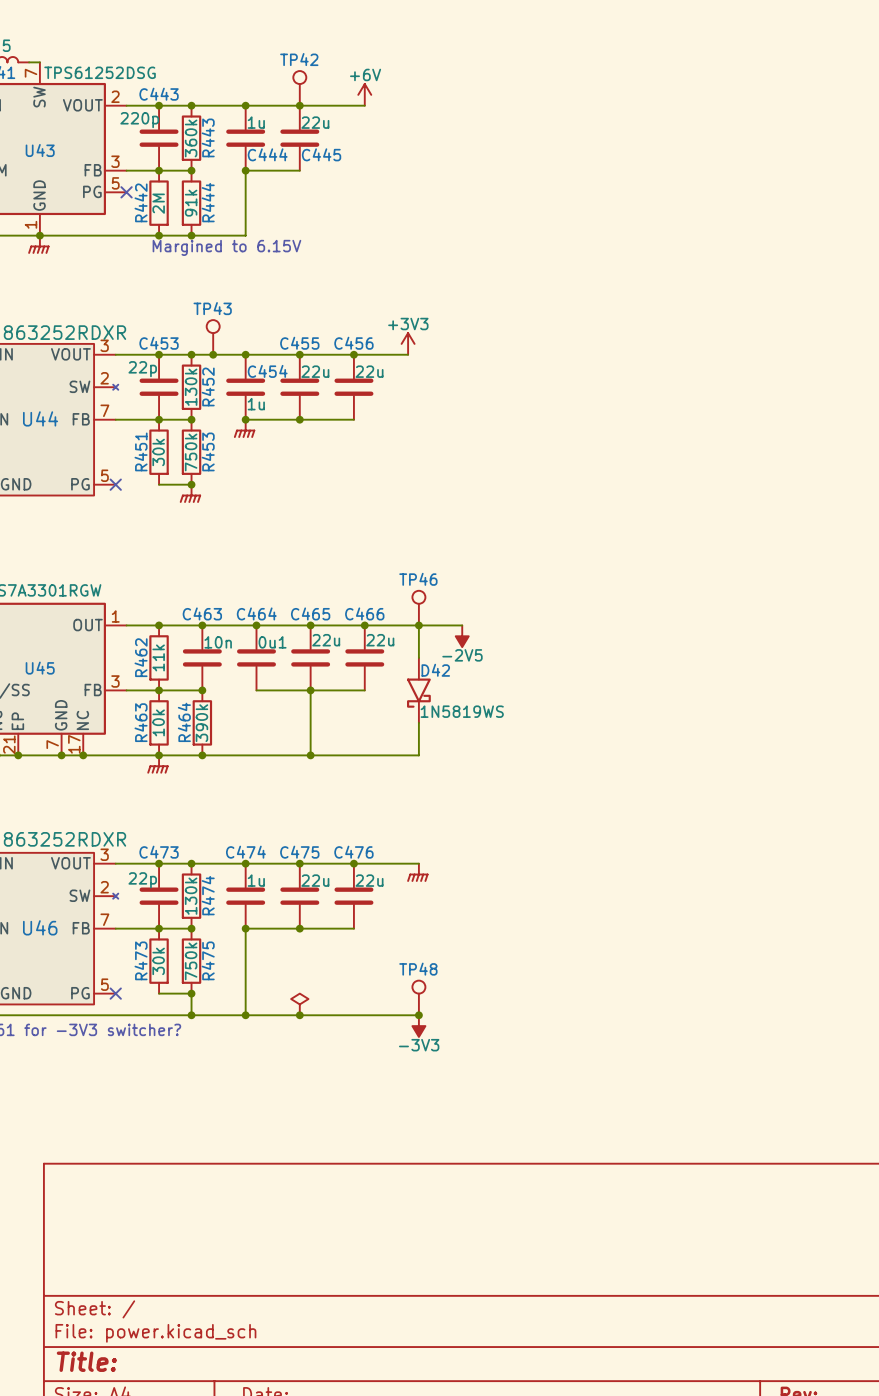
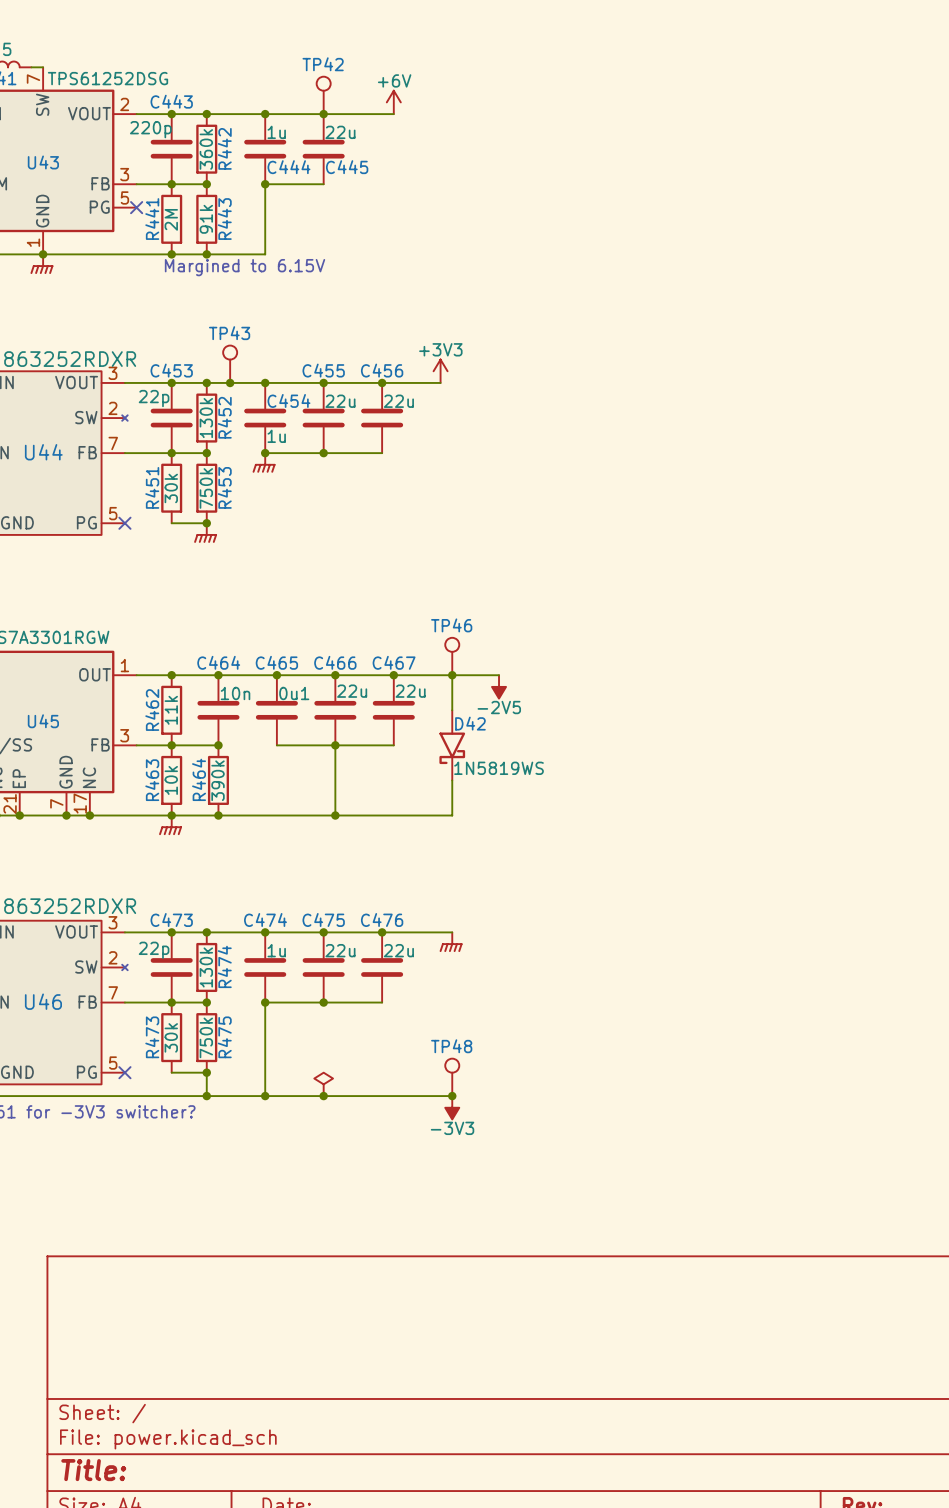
R443 name: R443 (208, 137) -> R442 (224, 148)
R442 name: R442 (141, 202) -> R441 (152, 219)
R444 name: R444 (208, 202) -> R443 (224, 219)
C463 name: C463 (202, 613) -> C464 (218, 662)
C464 name: C464 (256, 613) -> C465 (276, 662)
C465 name: C465 (310, 613) -> C466 (335, 662)
C466 name: C466 (364, 613) -> C467 (394, 662)

